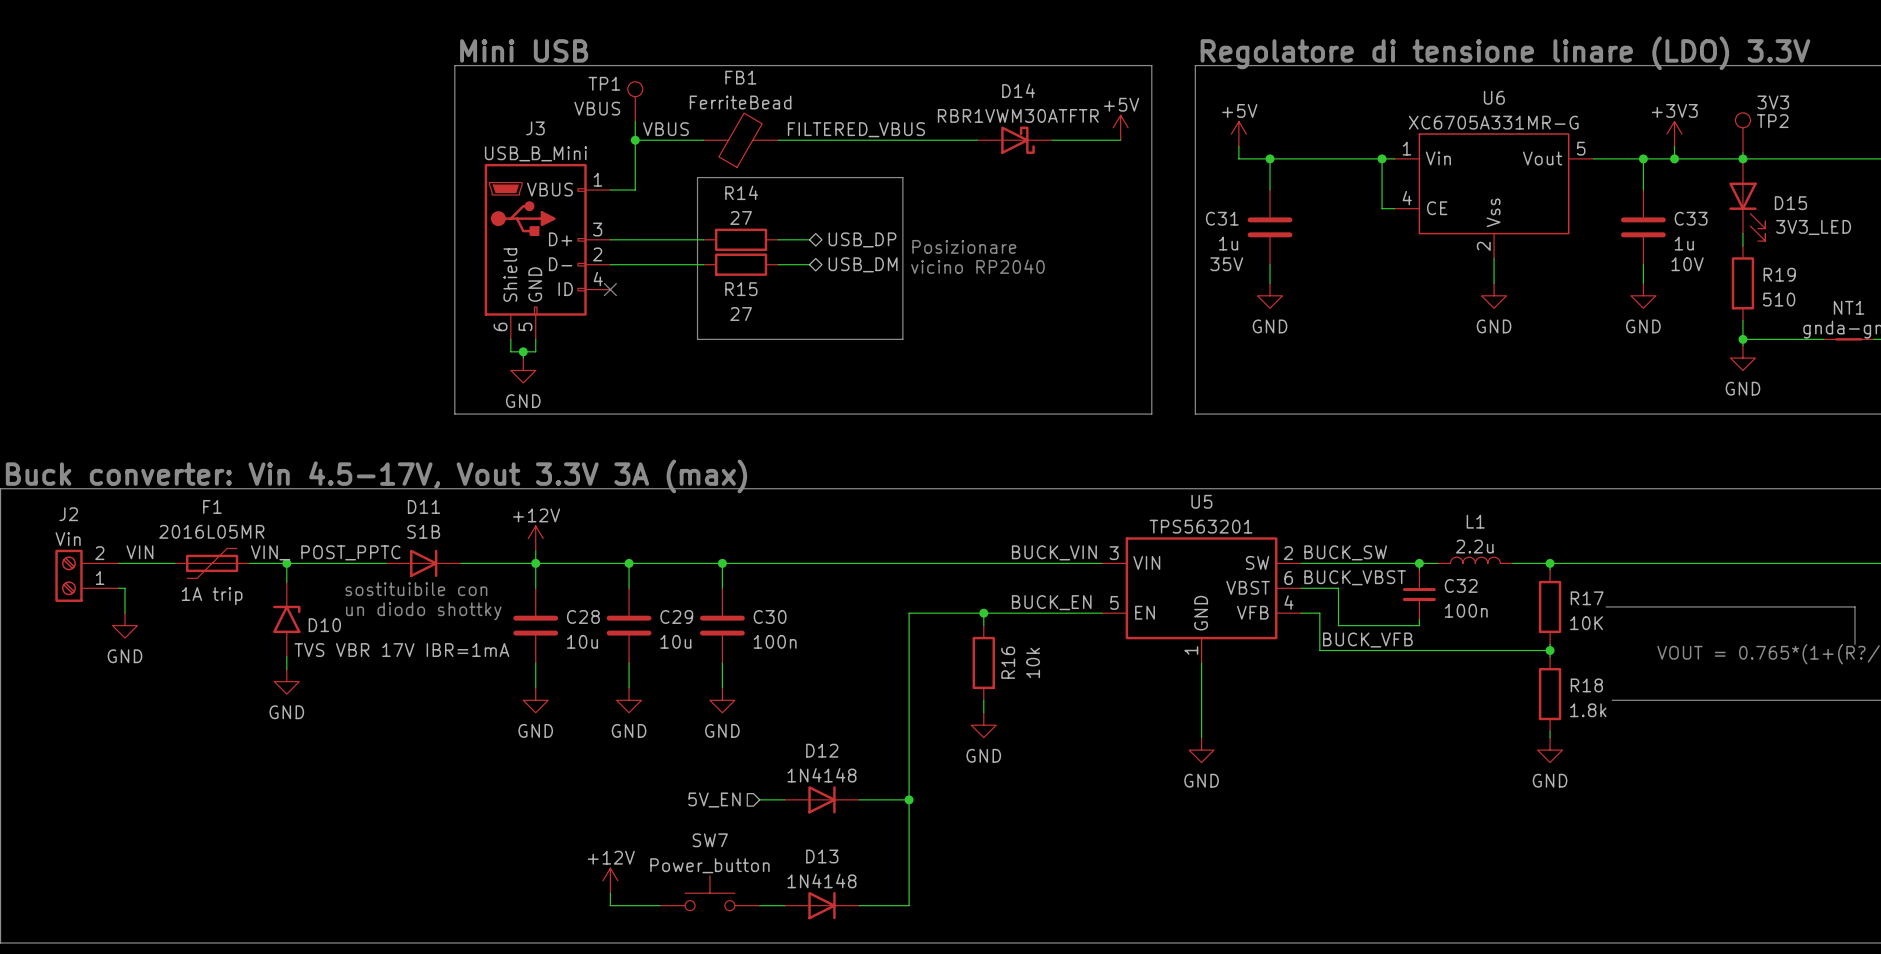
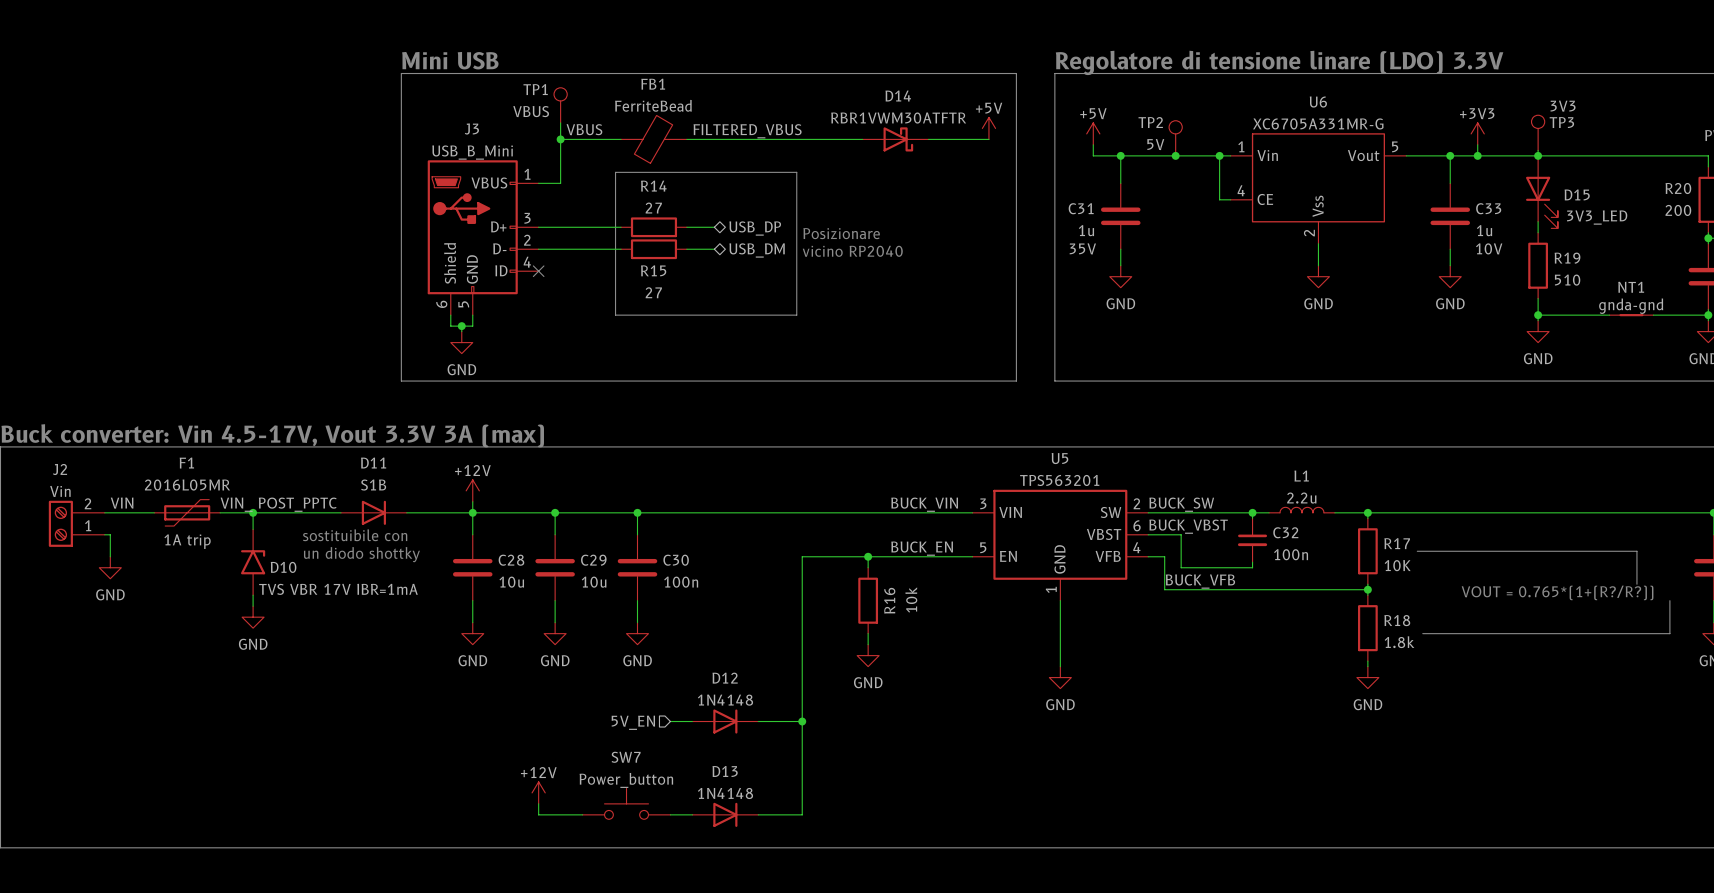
TP2 name: TP2 (1772, 121) -> TP3 (1561, 122)
TP2: none -> 5V (1175, 138)
junction: none -> (1175, 155)

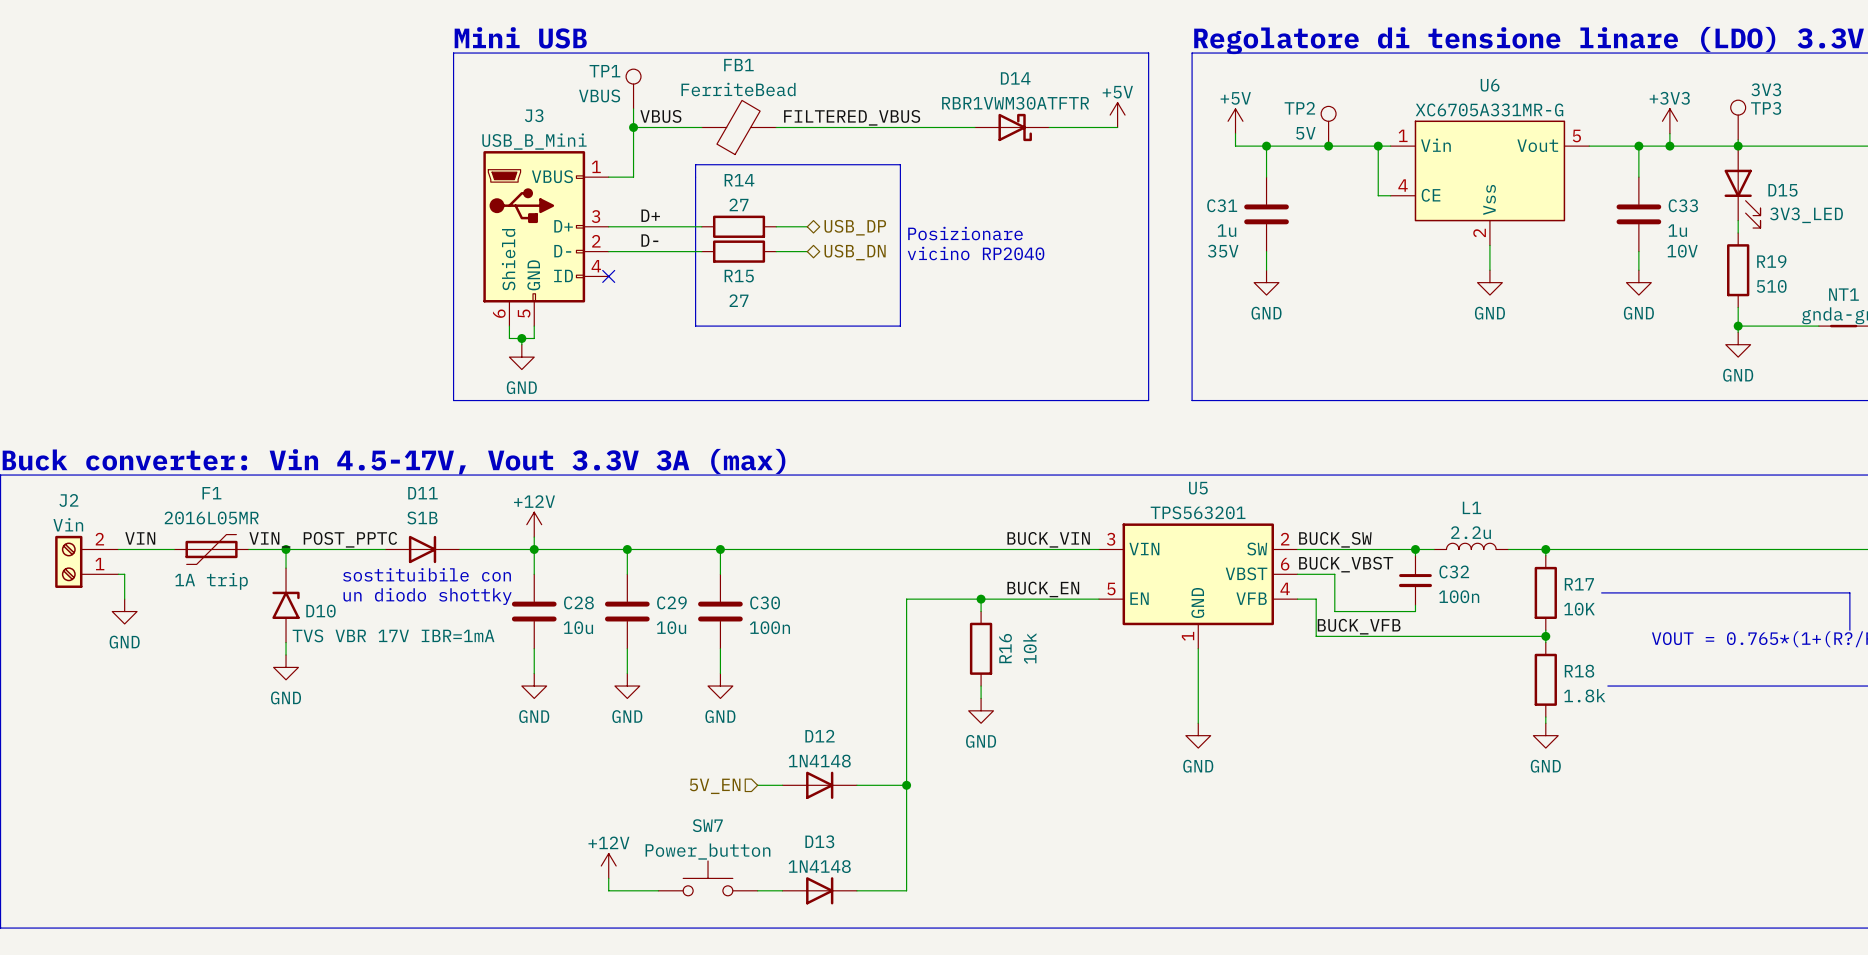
label: none -> D+ (650, 215)
label: none -> D- (649, 240)
hierarchical label: USB_DM (757, 250) -> USB_DN (855, 252)

